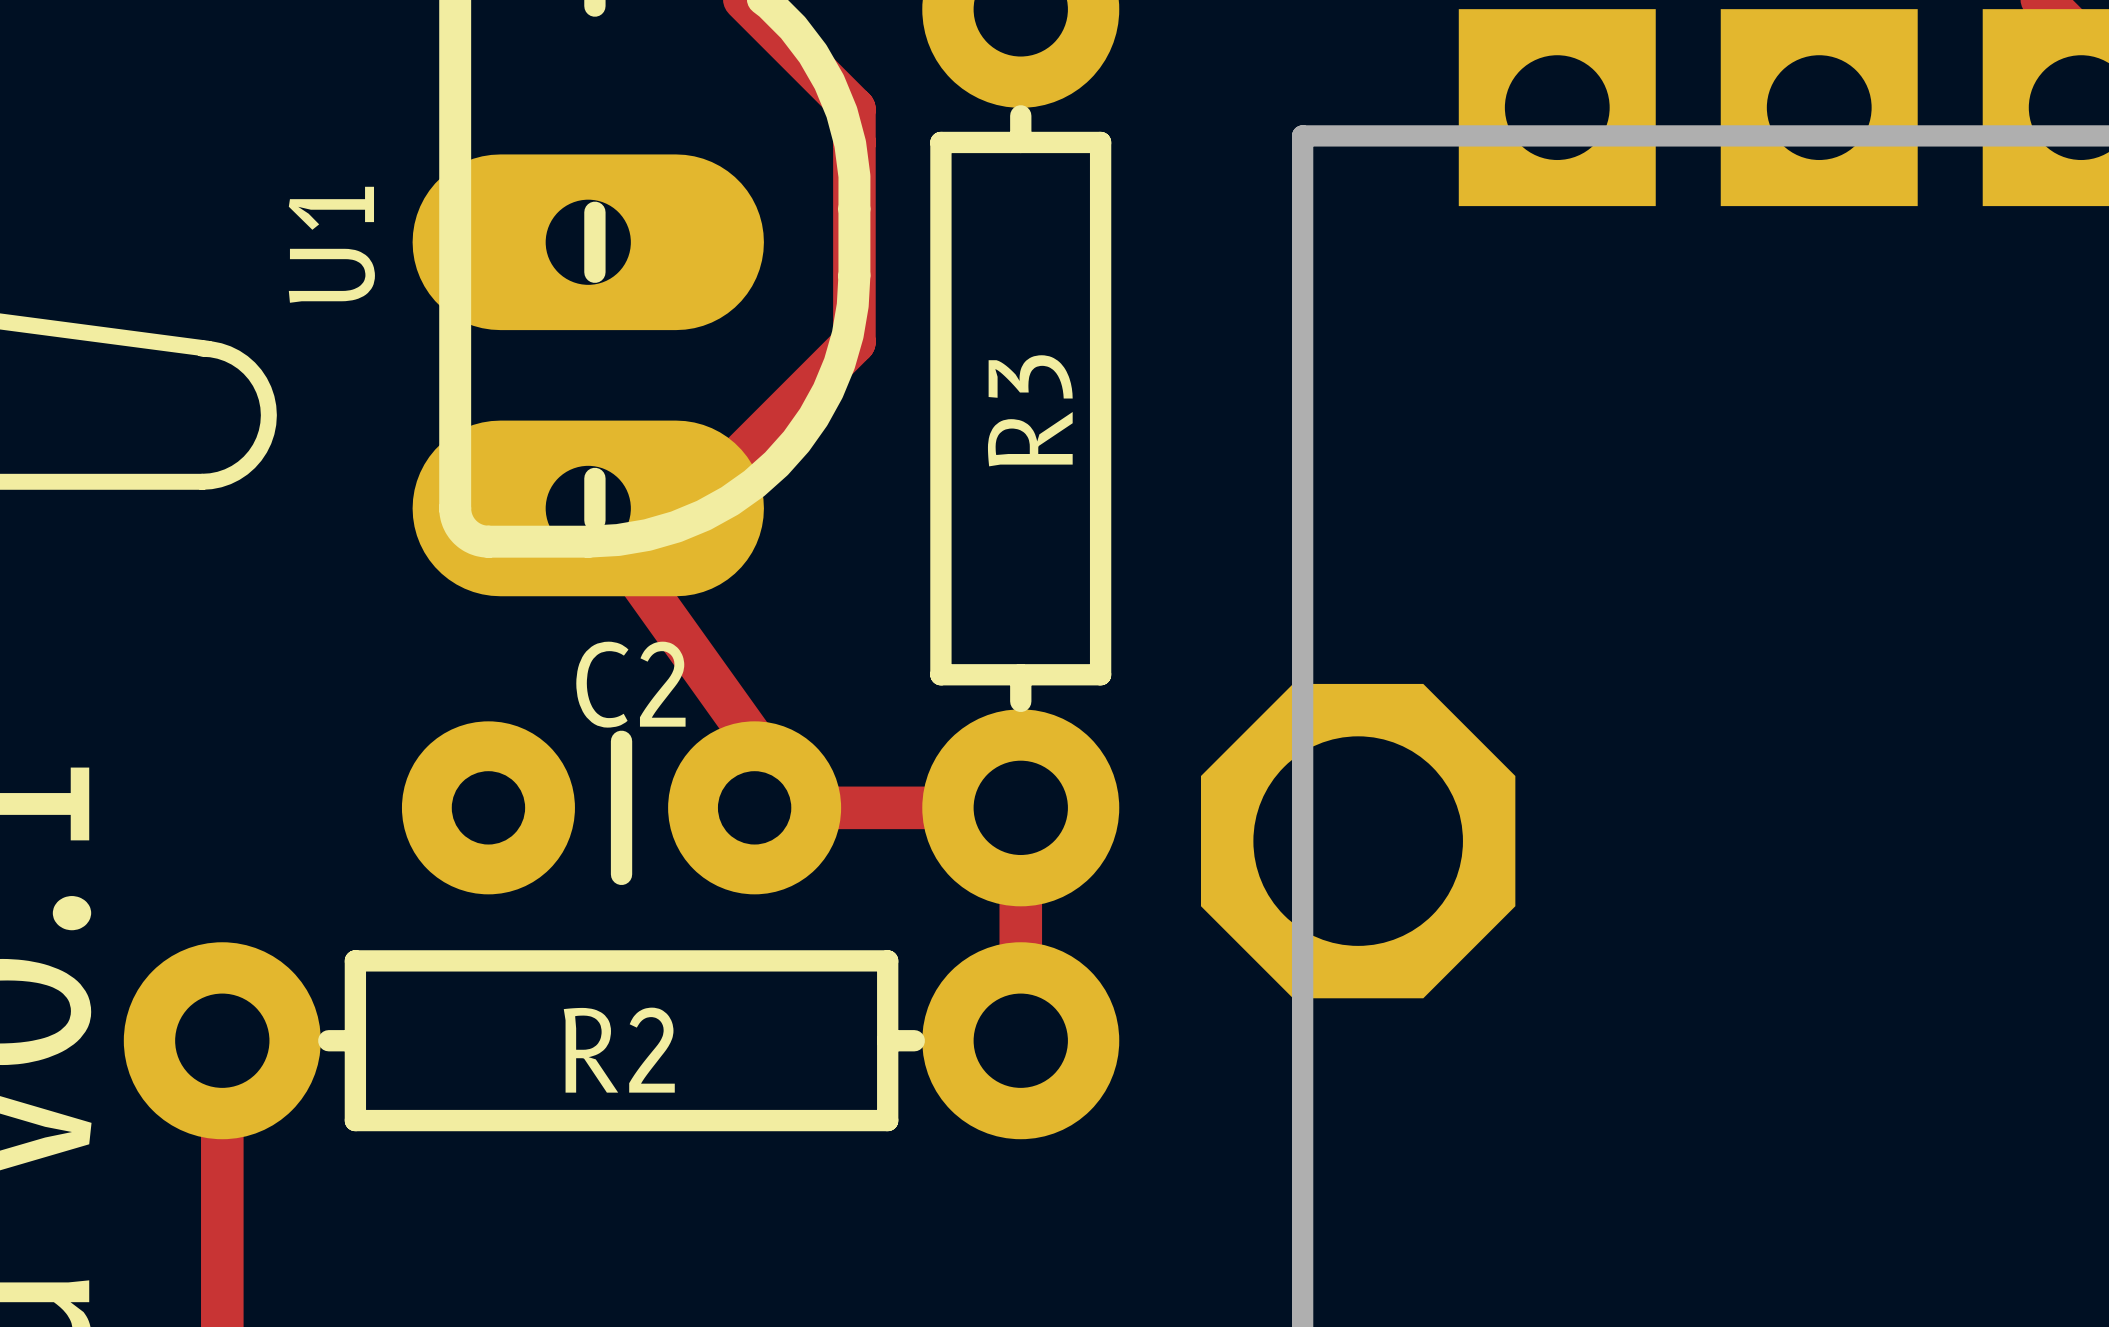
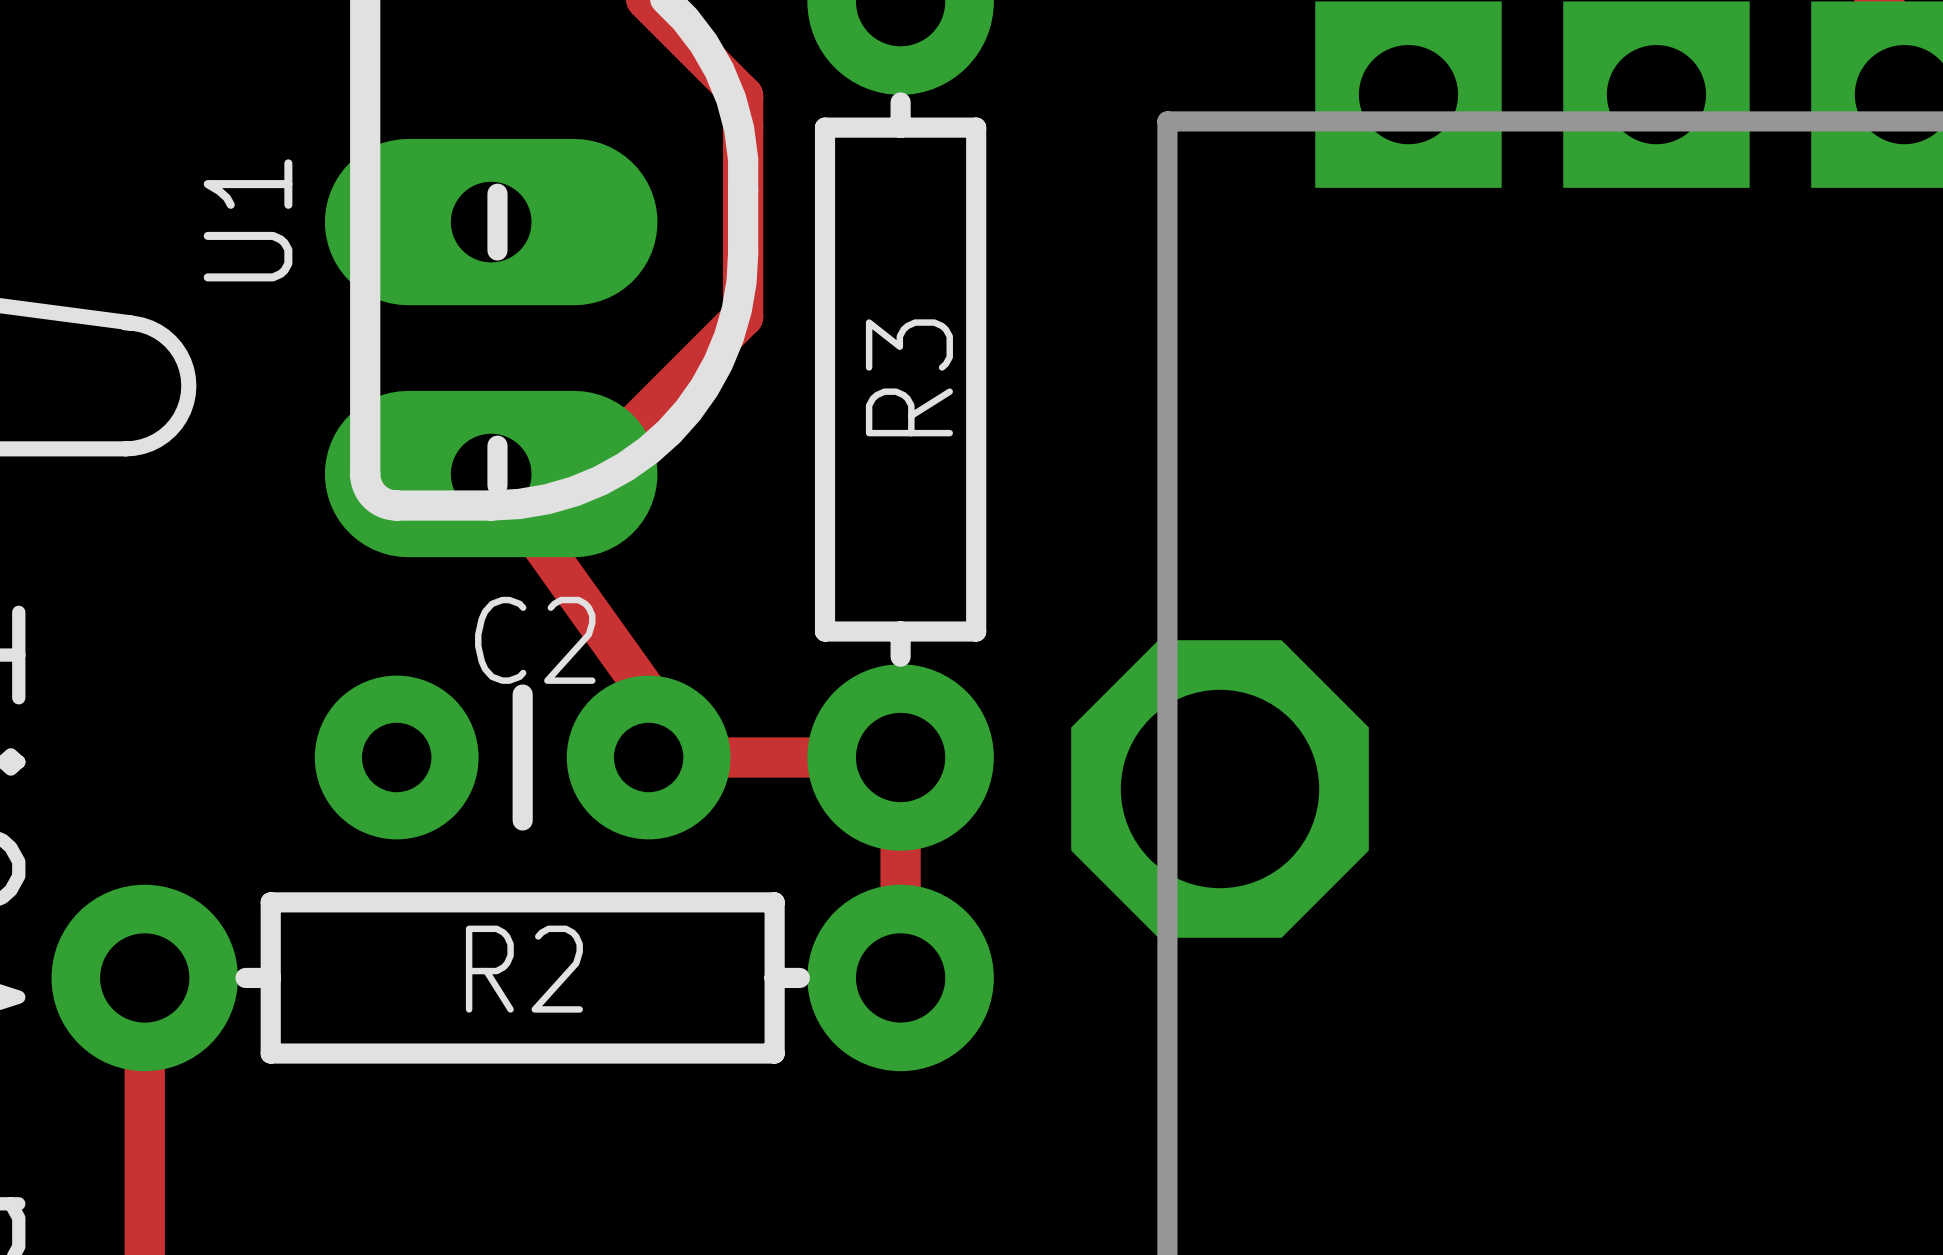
R2 name position: R2 (619, 1050) -> R2 (524, 969)

